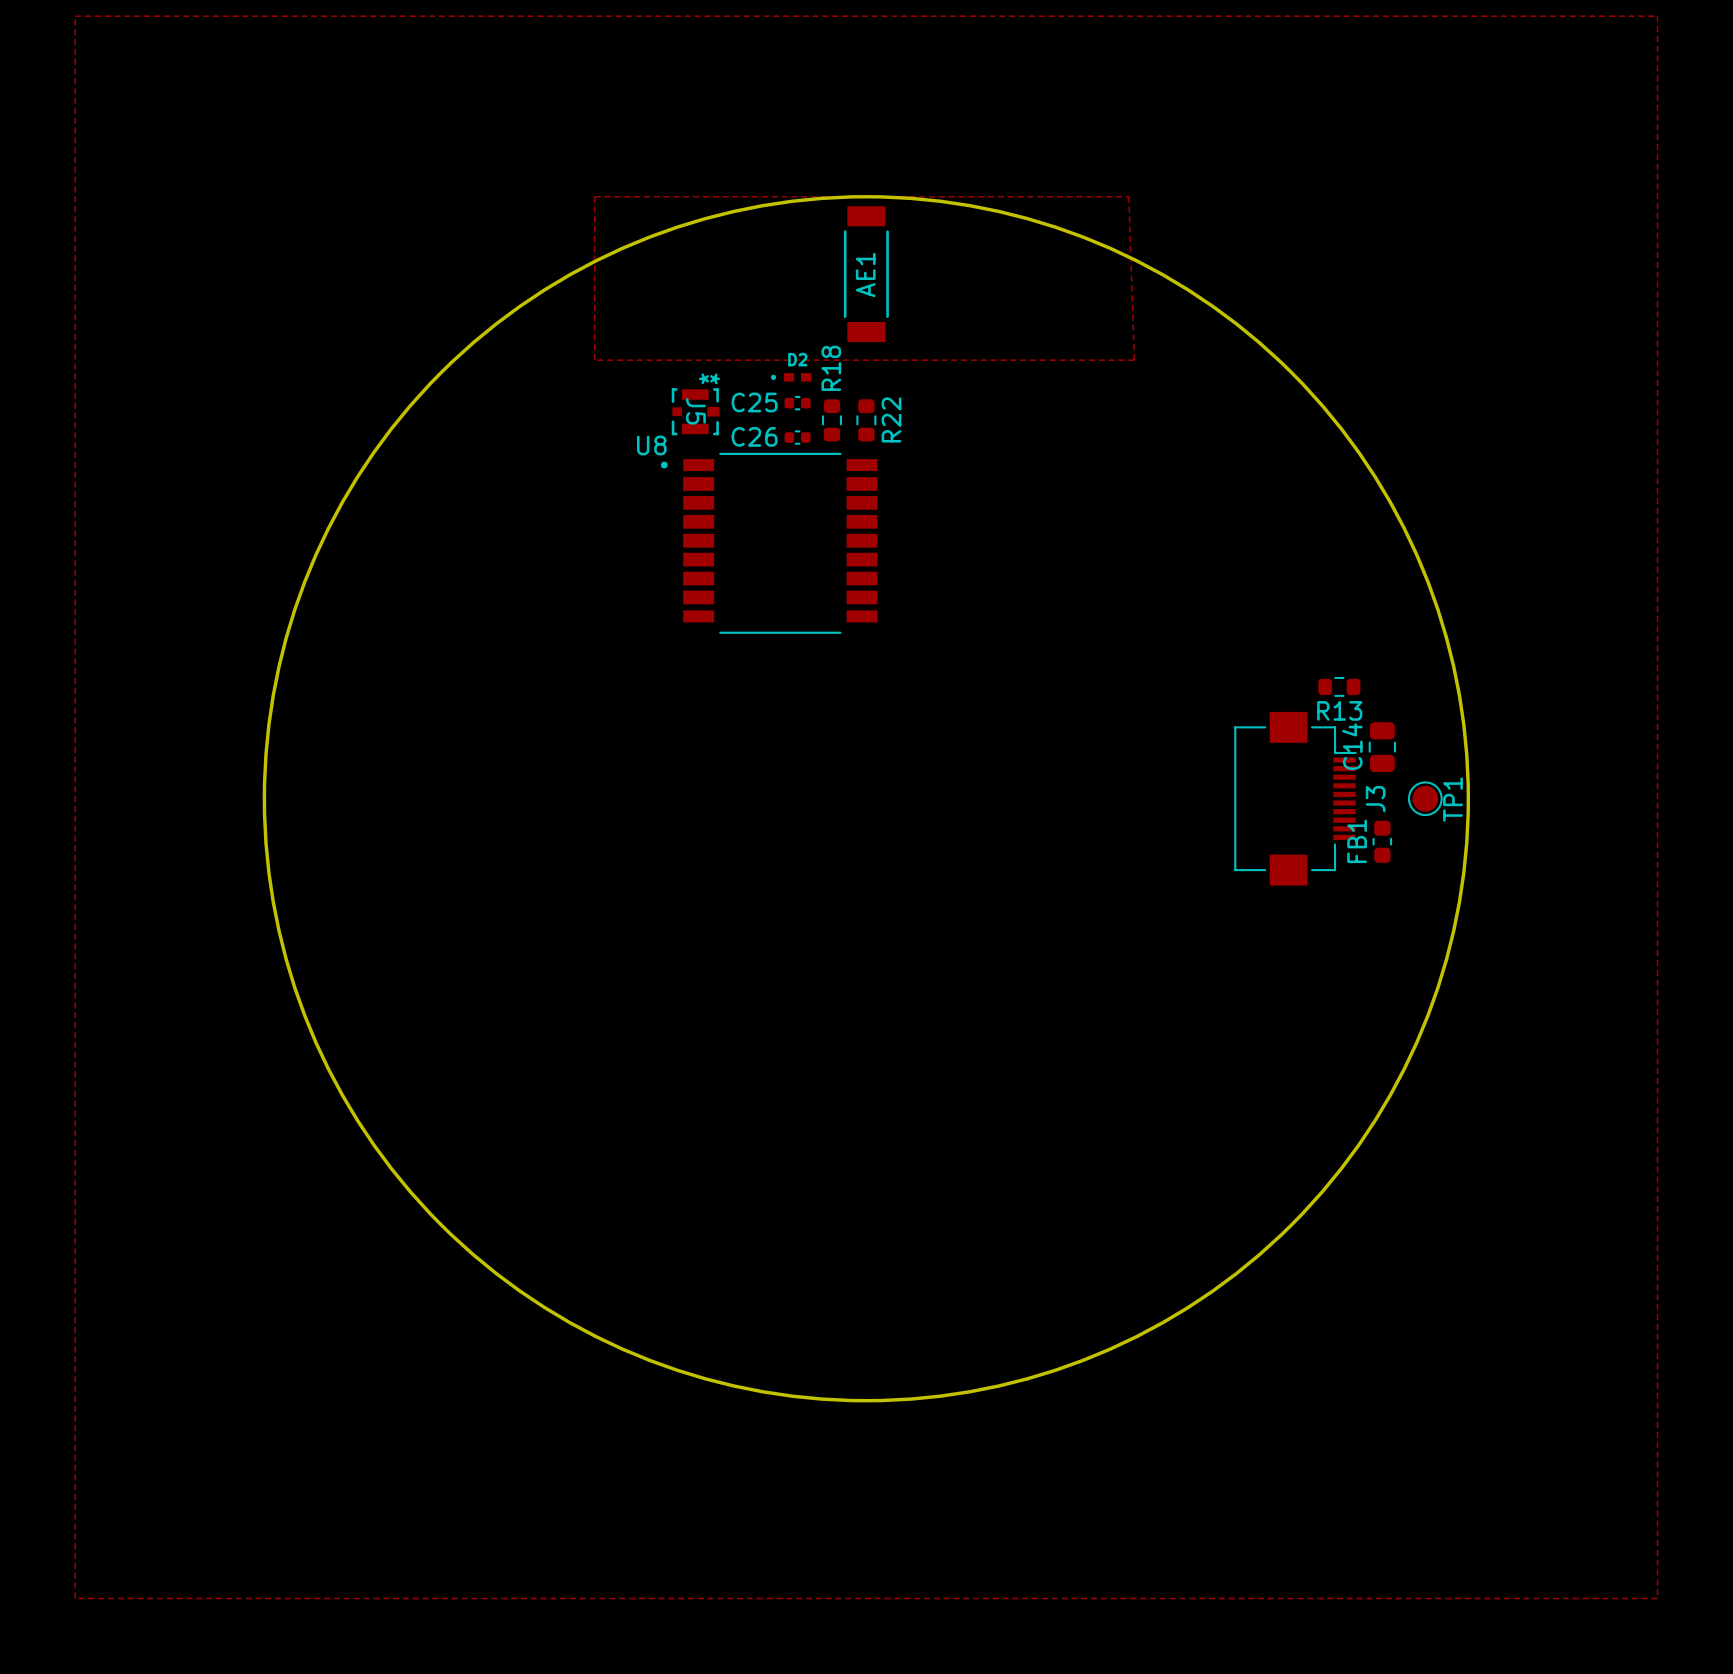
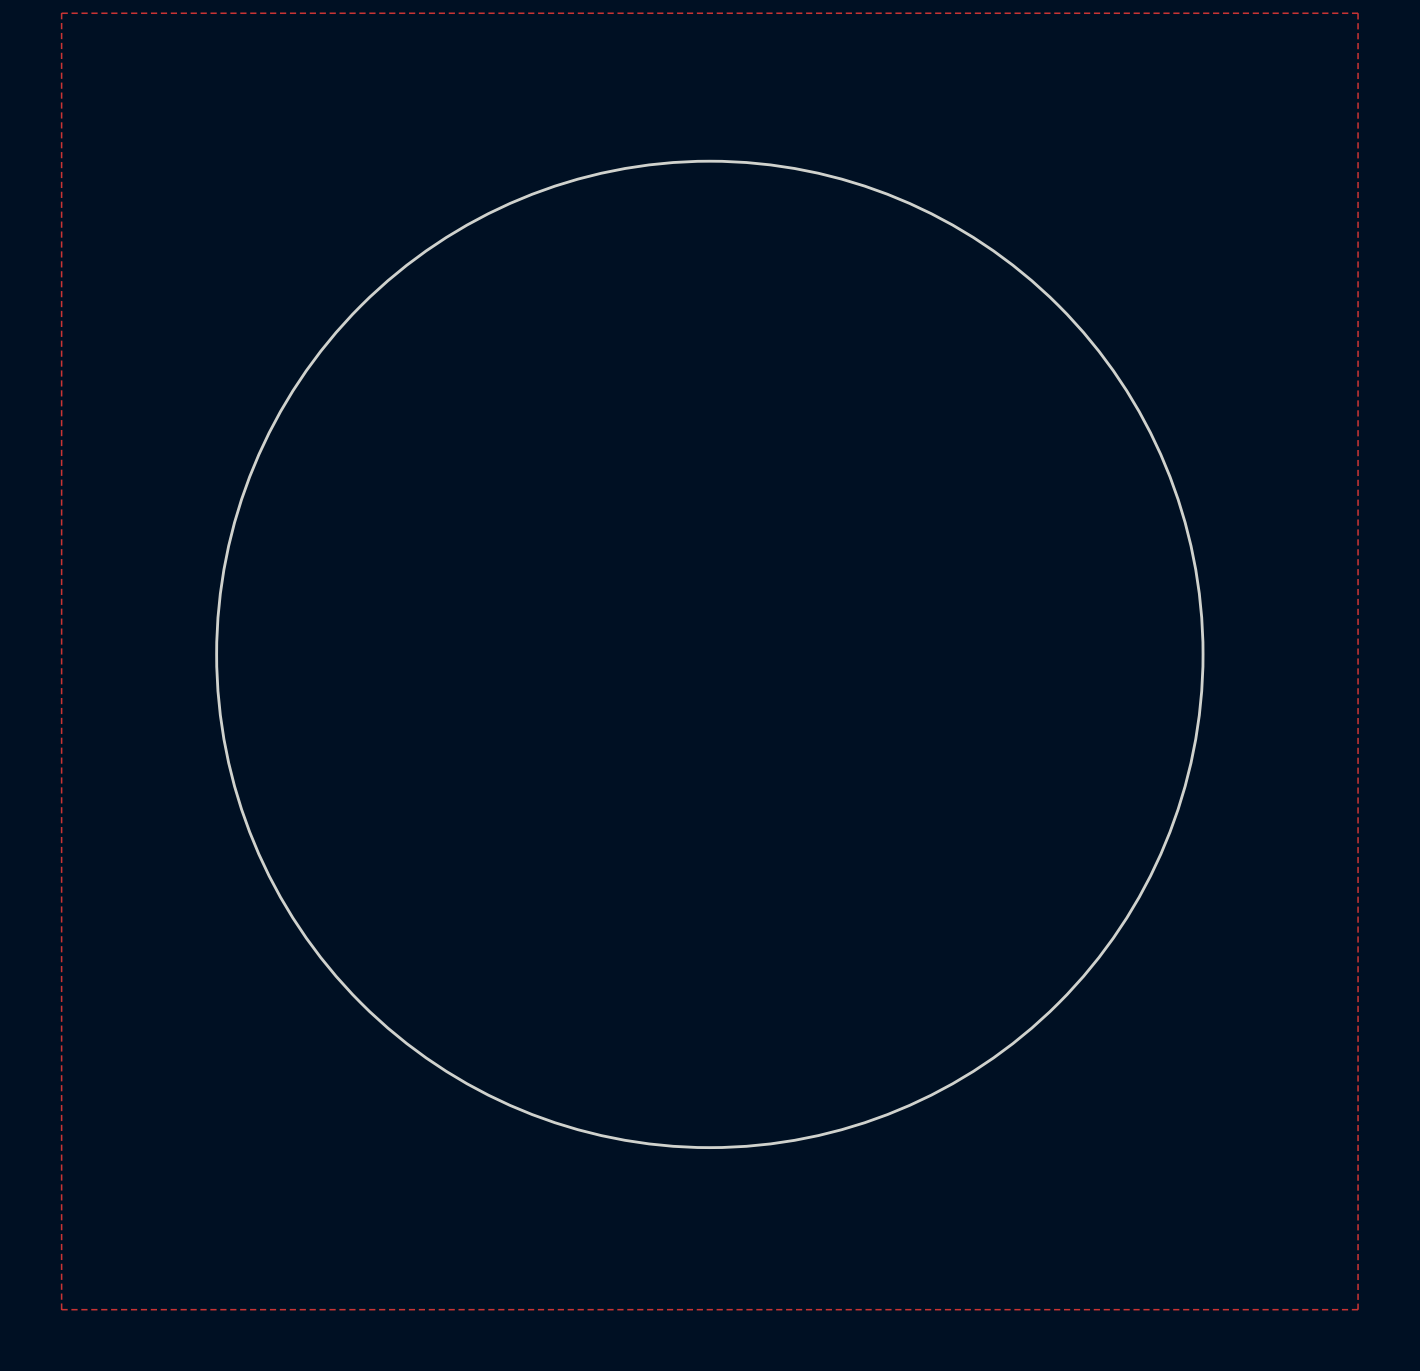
zone outline: (594, 196) (594, 360) (1134, 360) (1128, 196) (594, 196) -> none
AE1: (866, 274) -> none
D2: (791, 377) -> none
C25: (797, 403) -> none
J5: (695, 411) -> none
R18: (831, 420) -> none
R22: (866, 420) -> none
C26: (797, 437) -> none
U8: (769, 543) -> none
R13: (1339, 686) -> none
C14: (1382, 747) -> none
J3: (1295, 798) -> none
TP1: (1425, 798) -> none
FB1: (1382, 841) -> none

